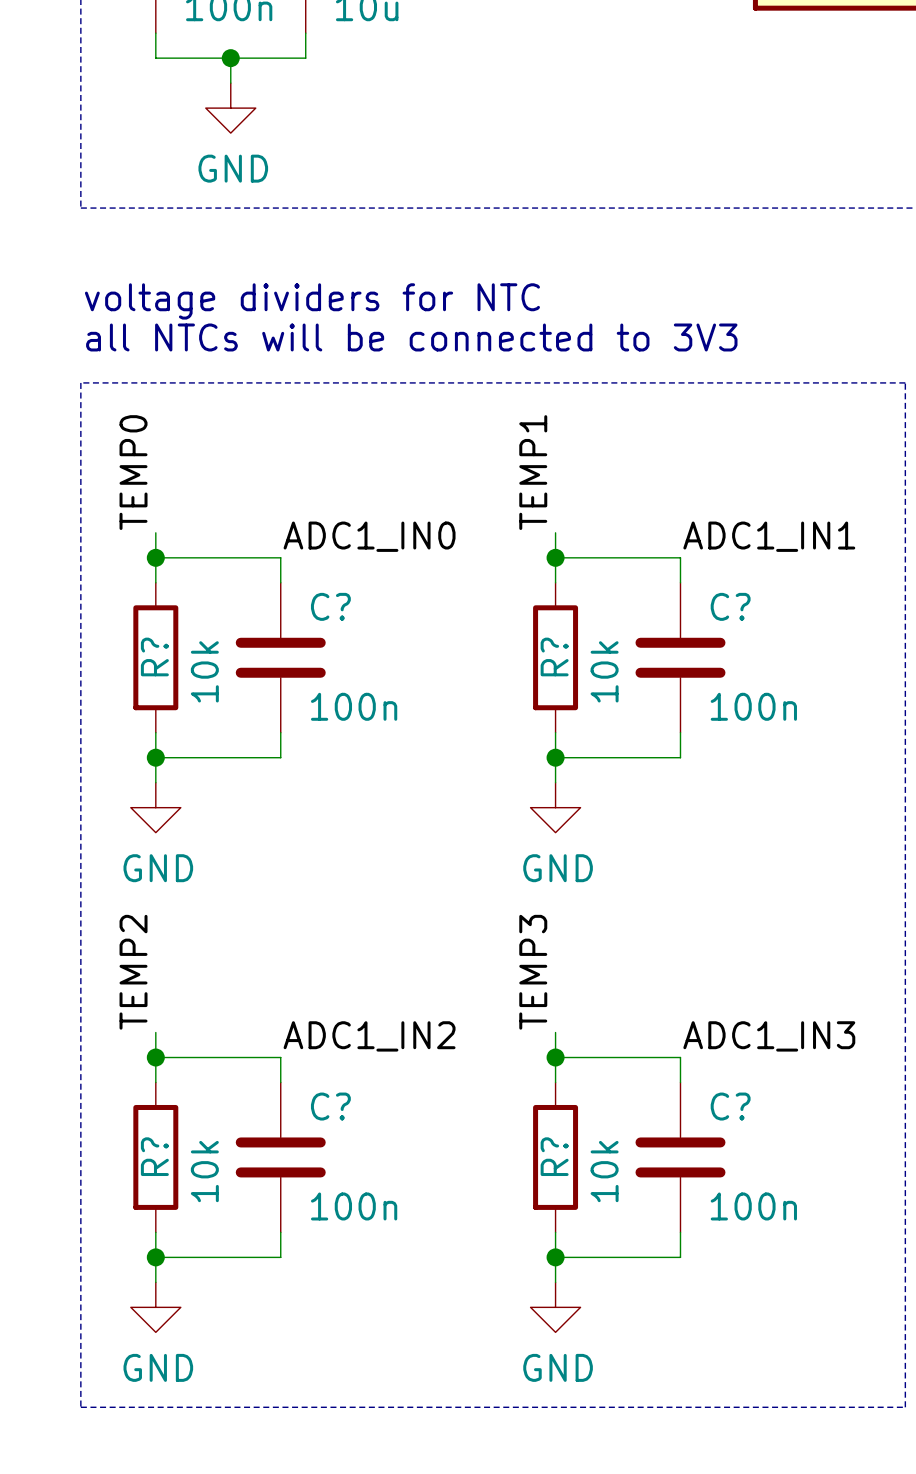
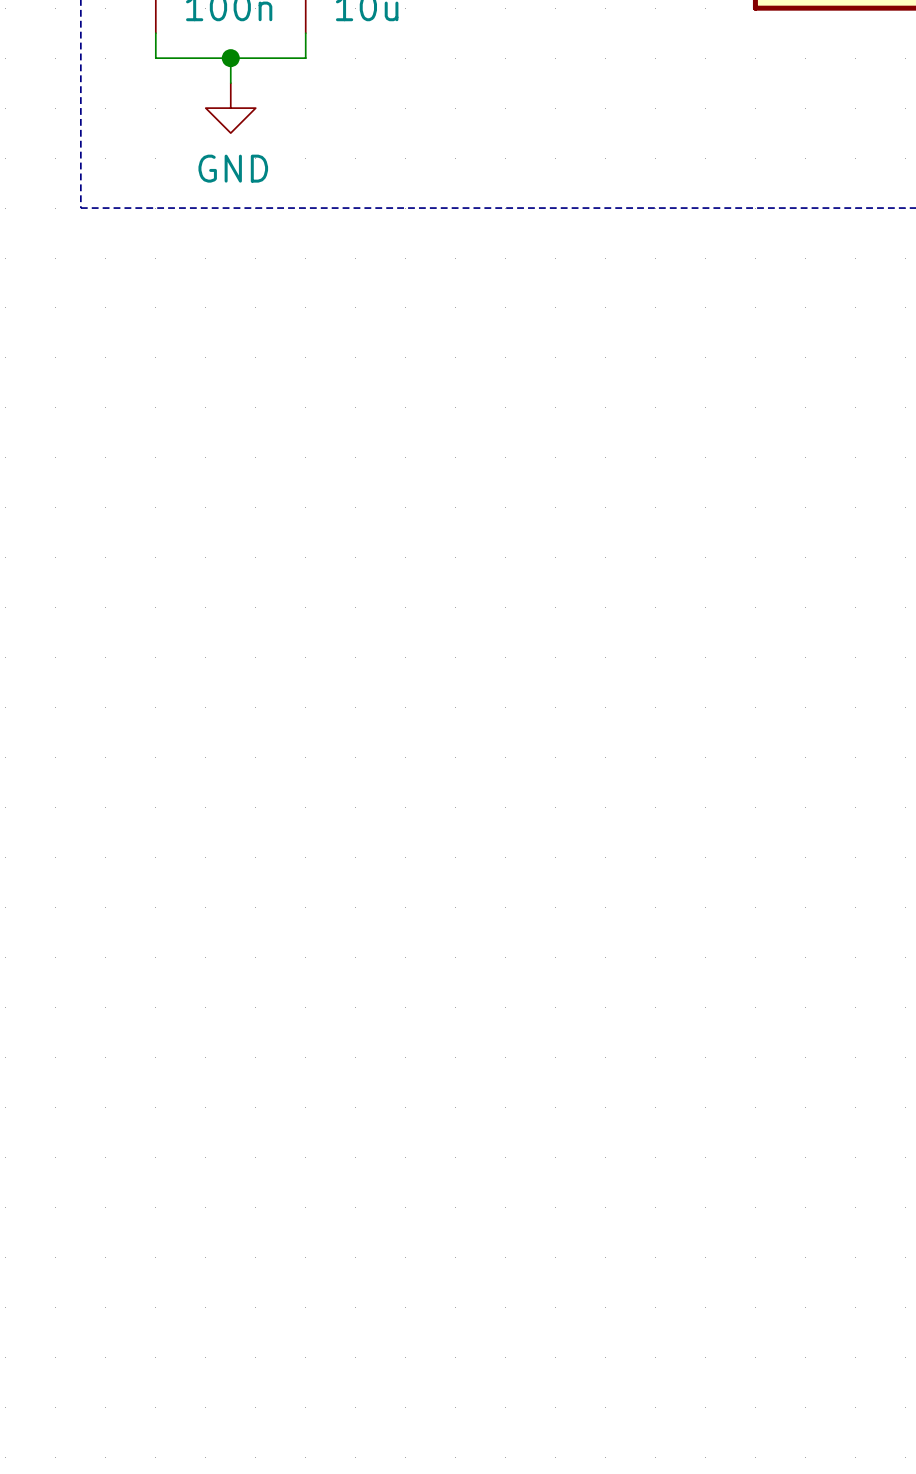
text: voltage dividers for NTC (312, 301) -> none
text: all NTCs will be connected to 3V3 (411, 337) -> none
line: (80, 382) (905, 382) (905, 1407) (80, 1407) (80, 382) -> none
label: TEMP0 (133, 472) -> none
label: TEMP1 (533, 472) -> none
wire: (155, 532) (155, 582) -> none
wire: (555, 532) (555, 582) -> none
label: ADC1_IN0 (369, 536) -> none
label: ADC1_IN1 (769, 536) -> none
wire: (155, 557) (280, 557) (280, 582) -> none
junction: (155, 557) -> none
wire: (555, 557) (680, 557) (680, 582) -> none
junction: (555, 557) -> none
R?: 10k (155, 657) -> none
C?: 100n (280, 657) -> none
R?: 10k (555, 657) -> none
C?: 100n (680, 657) -> none
wire: (155, 732) (155, 782) -> none
wire: (280, 732) (280, 757) (155, 757) -> none
wire: (555, 732) (555, 782) -> none
wire: (680, 732) (680, 757) (555, 757) -> none
junction: (155, 757) -> none
junction: (555, 757) -> none
power symbol: GND (155, 807) -> none
power symbol: GND (555, 807) -> none
label: TEMP2 (133, 972) -> none
label: TEMP3 (533, 972) -> none
wire: (155, 1032) (155, 1082) -> none
wire: (555, 1032) (555, 1082) -> none
label: ADC1_IN2 (369, 1036) -> none
label: ADC1_IN3 (769, 1036) -> none
wire: (155, 1057) (280, 1057) (280, 1082) -> none
junction: (155, 1057) -> none
wire: (555, 1057) (680, 1057) (680, 1082) -> none
junction: (555, 1057) -> none
R?: 10k (155, 1157) -> none
C?: 100n (280, 1157) -> none
R?: 10k (555, 1157) -> none
C?: 100n (680, 1157) -> none
wire: (155, 1232) (155, 1282) -> none
wire: (280, 1232) (280, 1257) (155, 1257) -> none
wire: (555, 1232) (555, 1282) -> none
wire: (680, 1232) (680, 1257) (555, 1257) -> none
junction: (155, 1257) -> none
junction: (555, 1257) -> none
power symbol: GND (155, 1307) -> none
power symbol: GND (555, 1307) -> none

